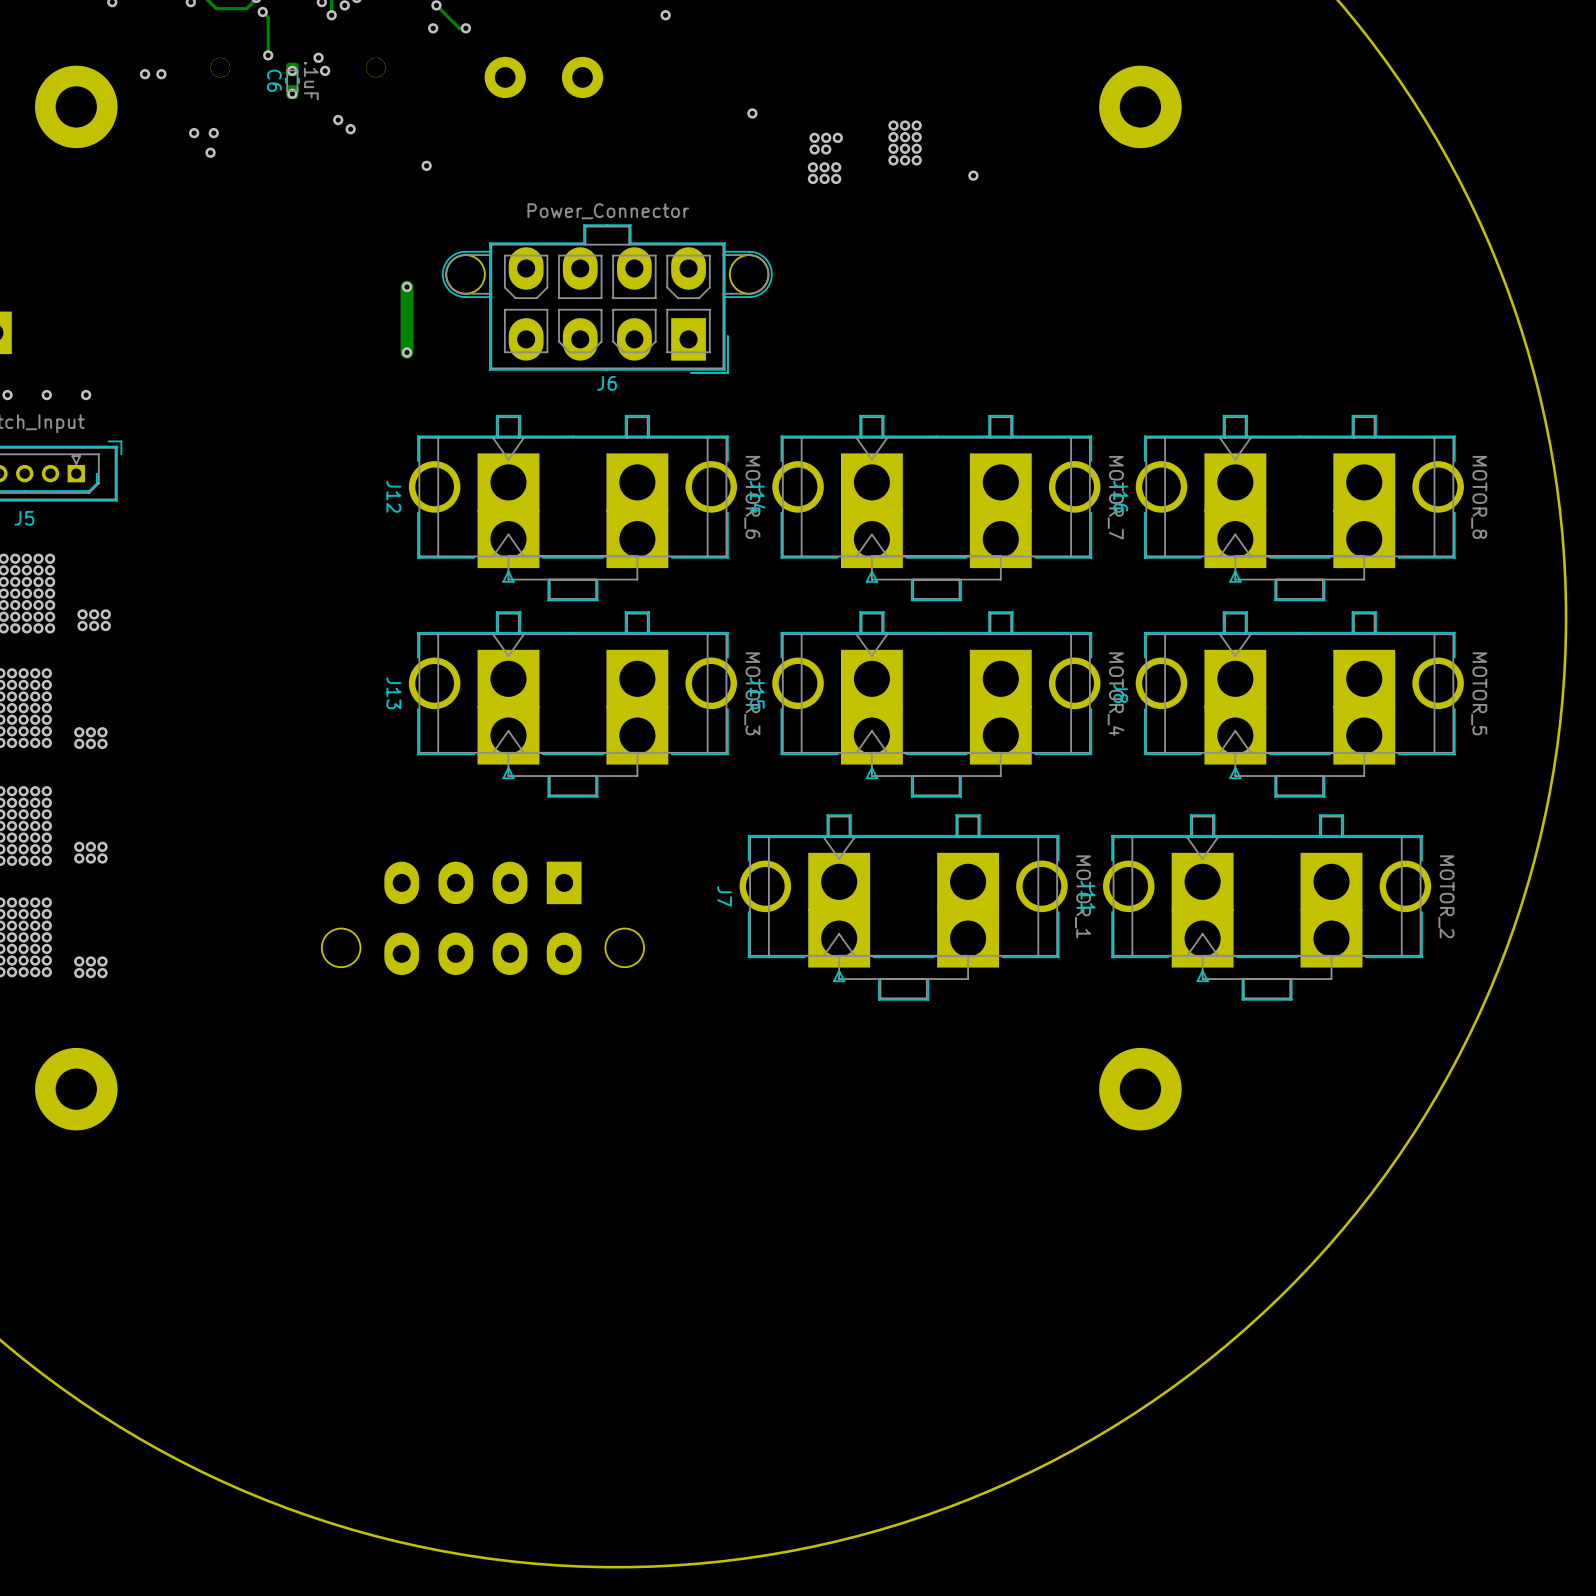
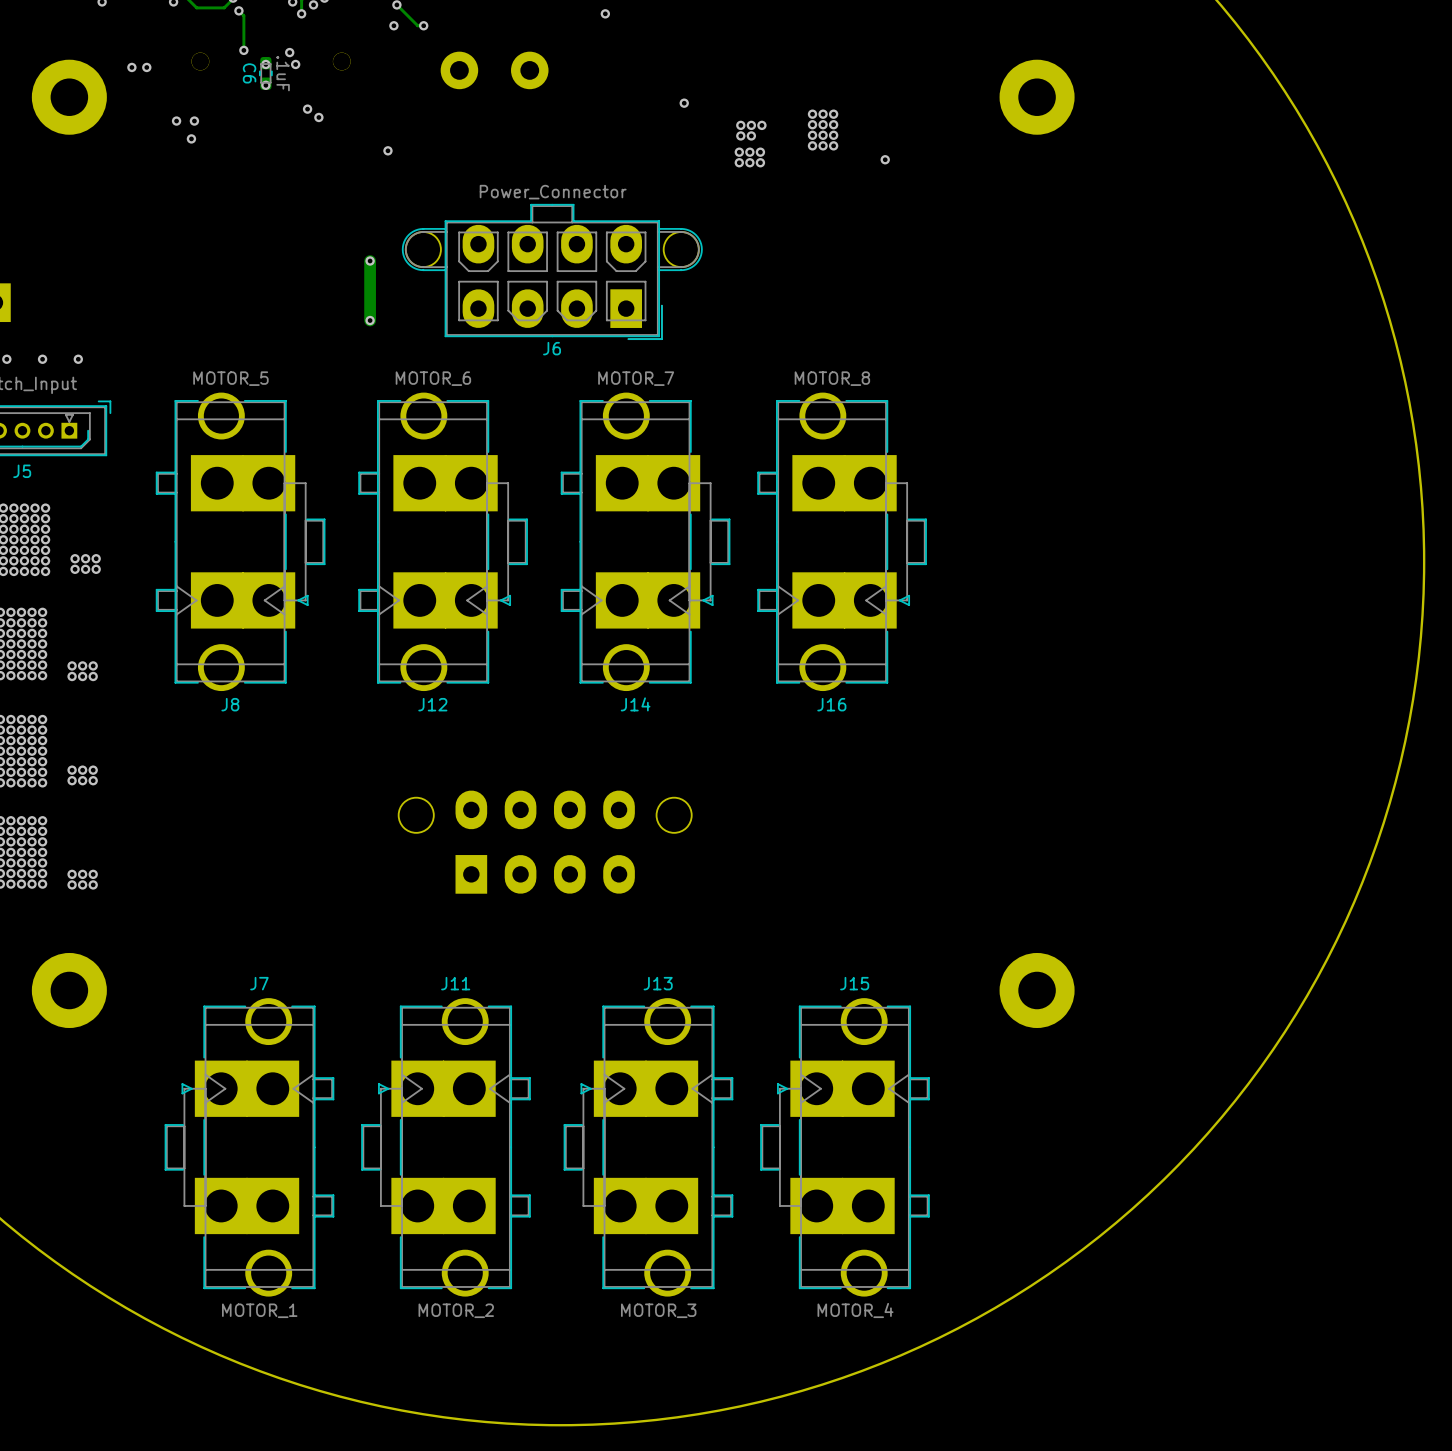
J12 rotation: 0° (572, 508) -> 90° counterclockwise (443, 541)
J14 rotation: 0° (936, 508) -> 90° counterclockwise (645, 541)
J14 position: (936, 508) -> (645, 541)
J16 rotation: 0° (1299, 508) -> 90° counterclockwise (842, 541)
J16 position: (1299, 508) -> (842, 541)
J13 rotation: 0° (572, 704) -> 90° clockwise (648, 1147)
J13 position: (572, 704) -> (648, 1147)
J15 rotation: 0° (936, 704) -> 90° clockwise (844, 1147)
J15 position: (936, 704) -> (844, 1147)
J8 rotation: 0° (1299, 704) -> 90° counterclockwise (240, 541)
J8 position: (1299, 704) -> (240, 541)
J7 rotation: 0° (903, 907) -> 90° clockwise (249, 1147)
J7 position: (903, 907) -> (249, 1147)
J11 rotation: 0° (1267, 907) -> 90° clockwise (445, 1147)
J11 position: (1267, 907) -> (445, 1147)
part rotation: 0° (482, 918) -> 180° (545, 842)

